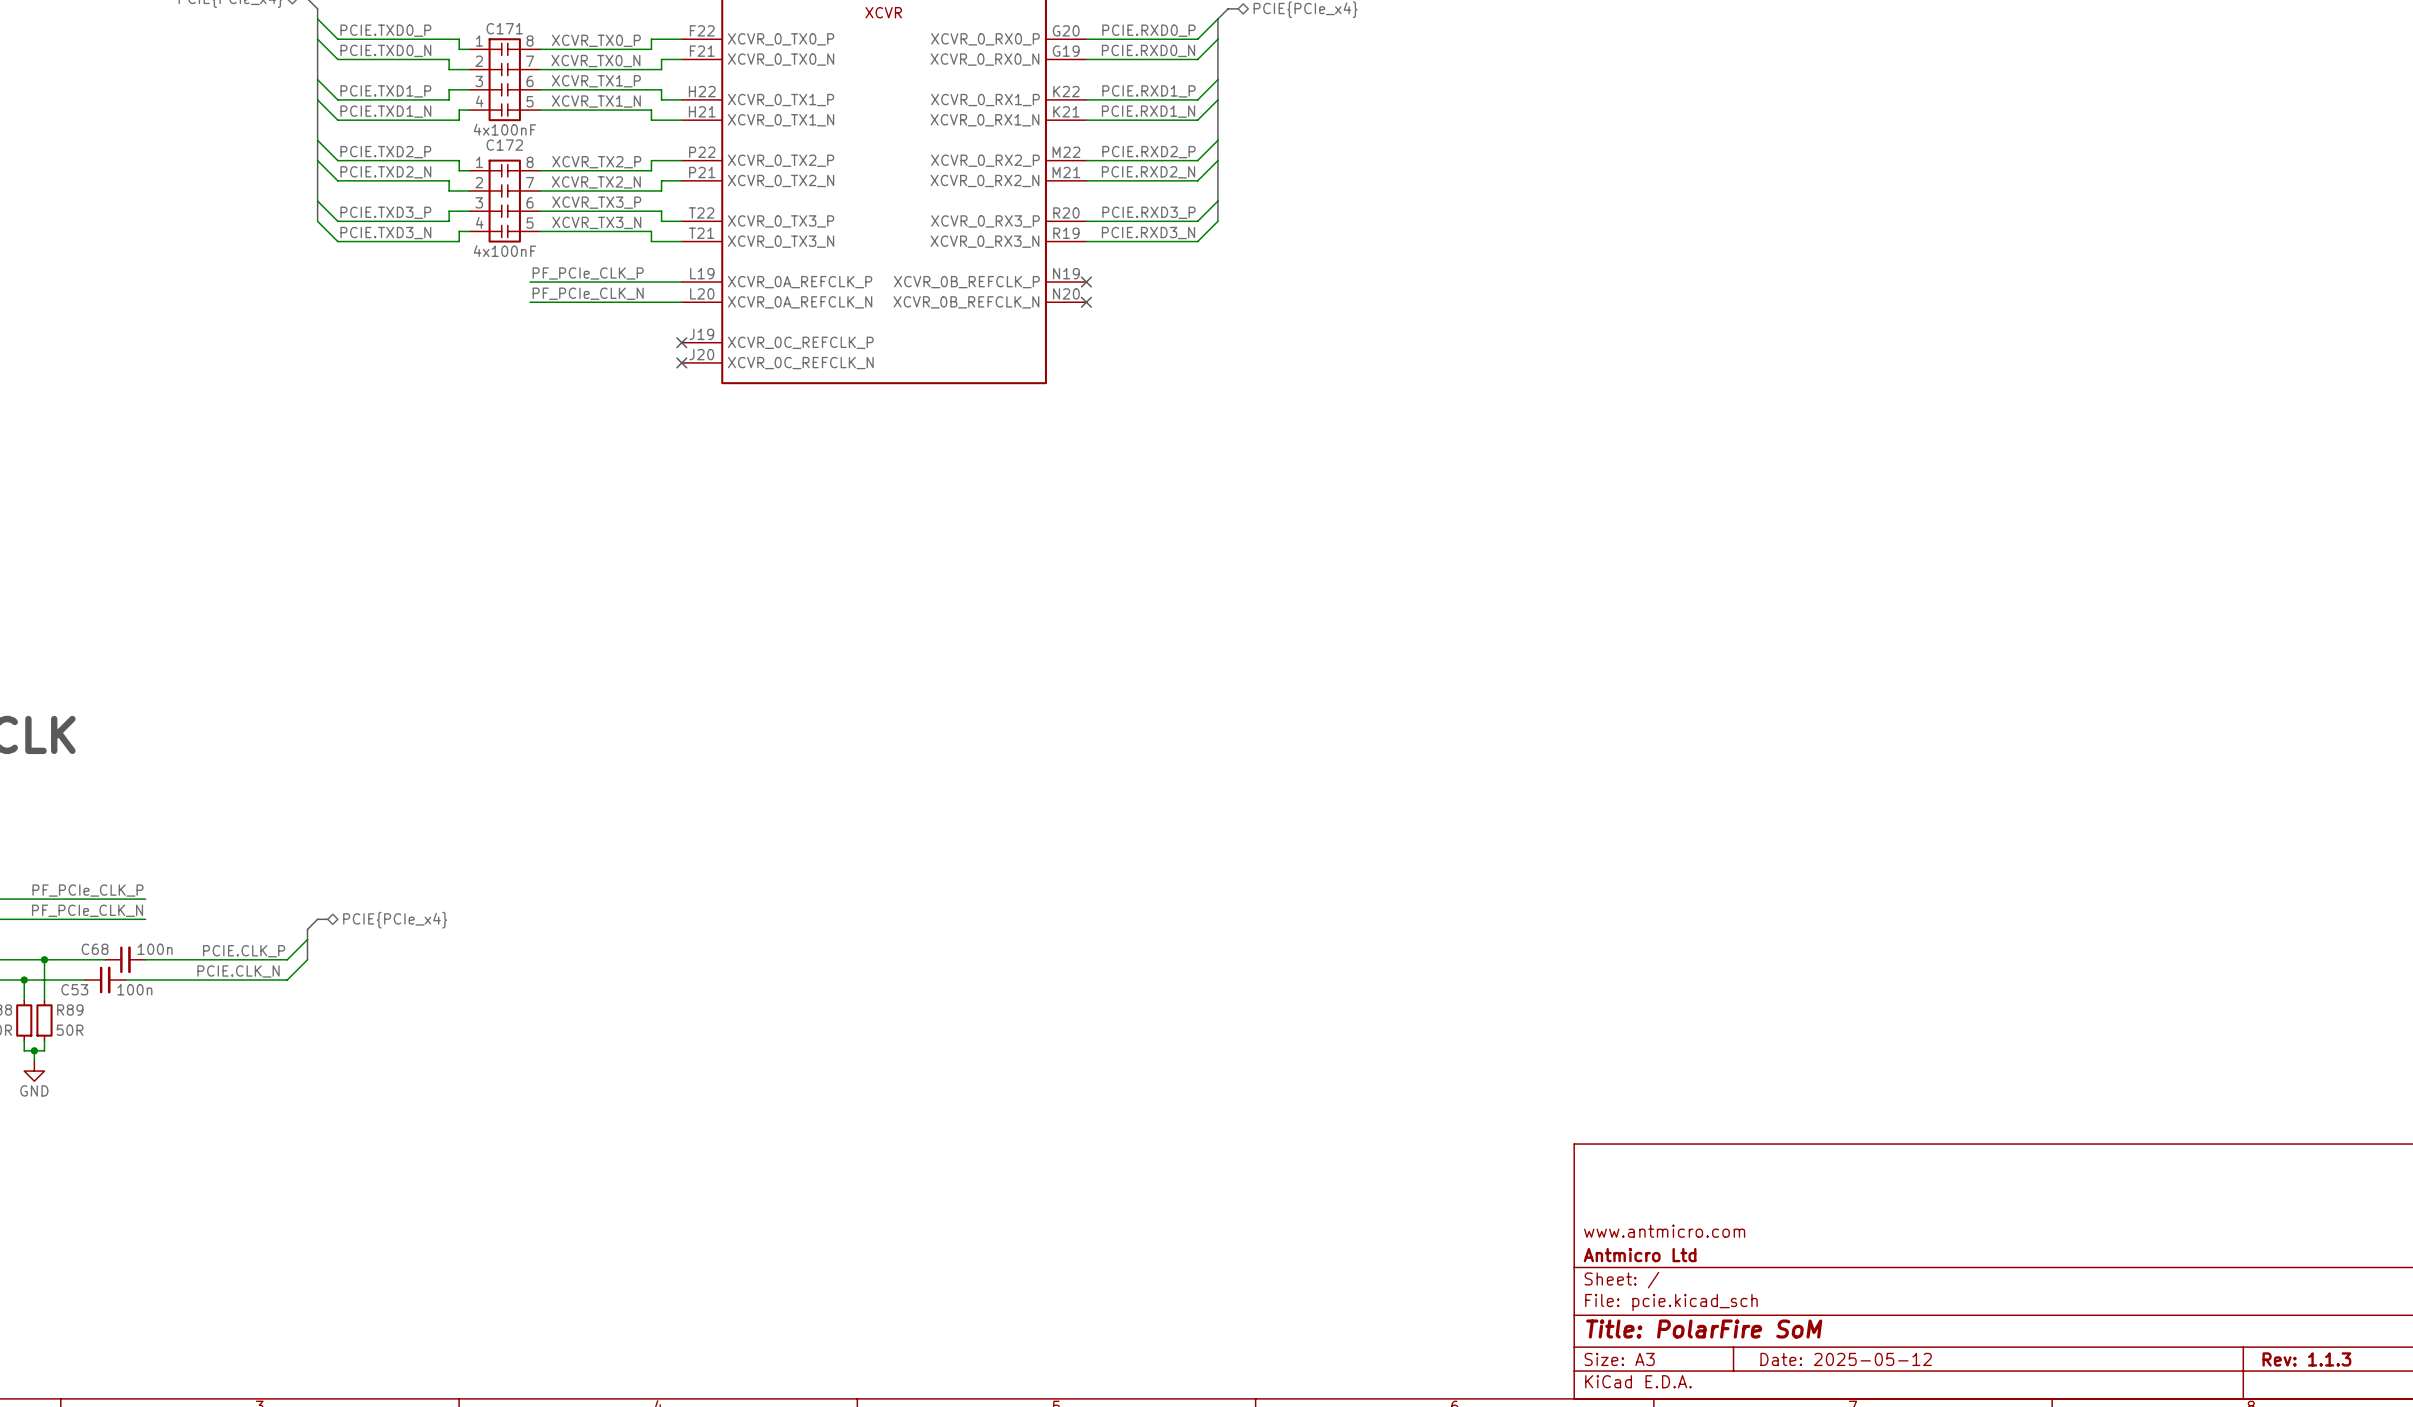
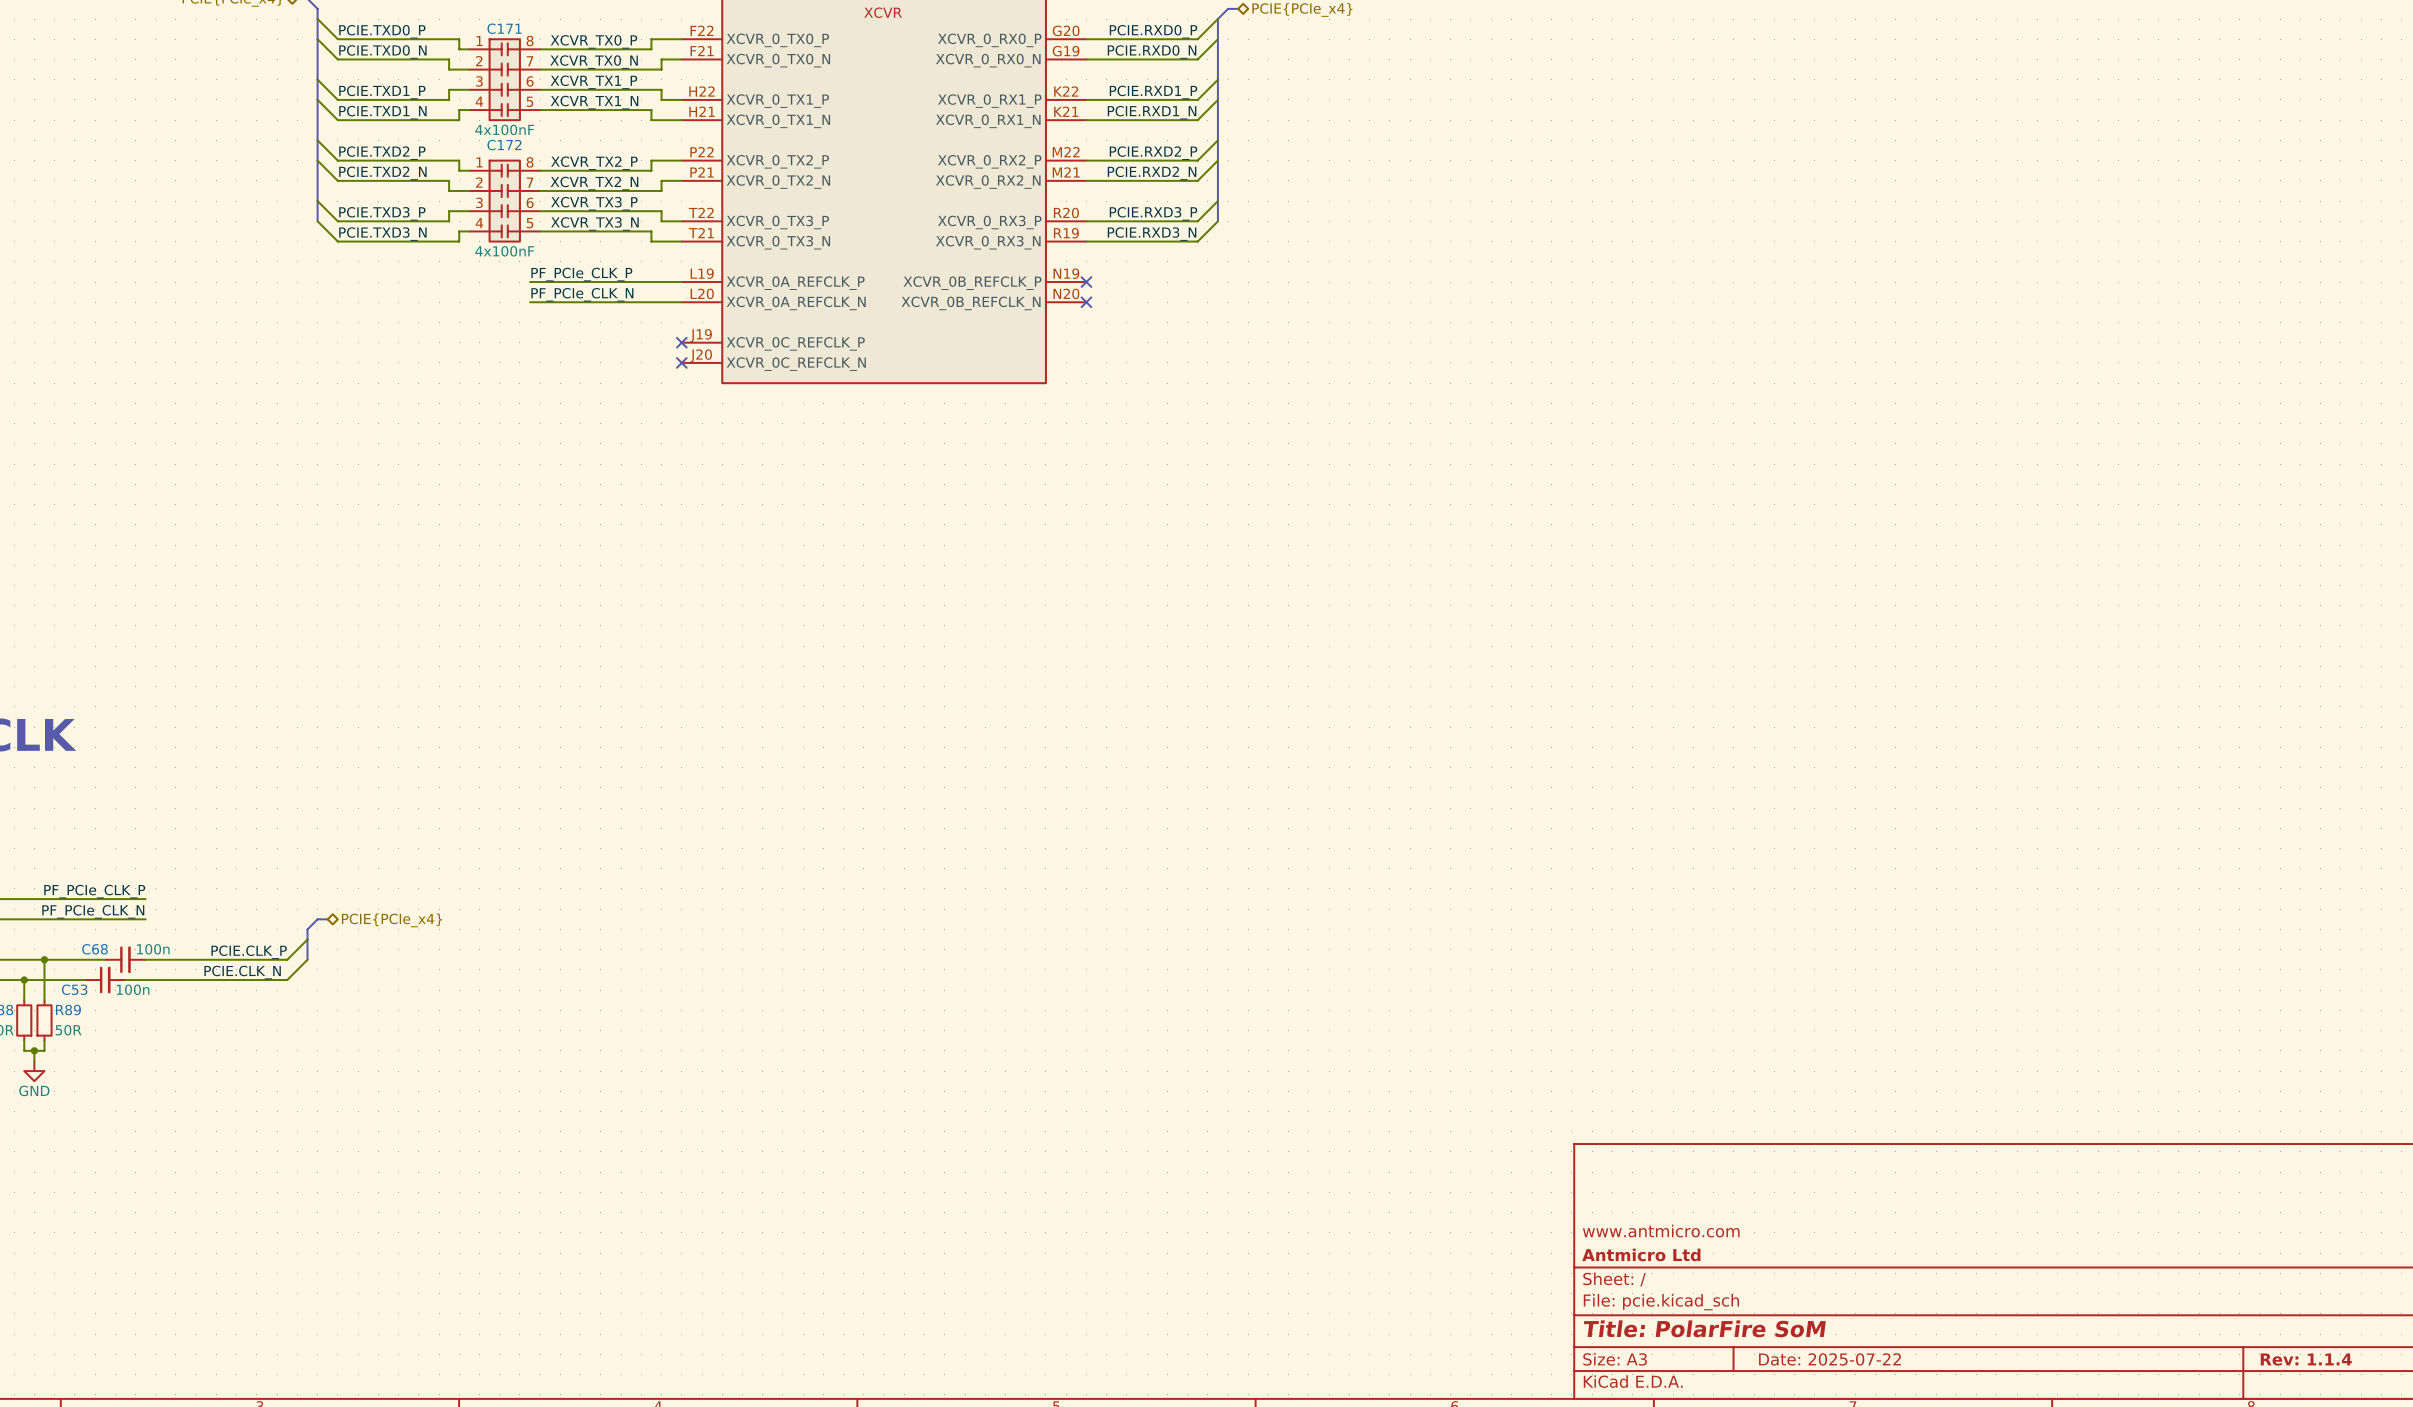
title block: Date: 2025-05-12 (1846, 1359) -> Date: 2025-07-22 (1829, 1359)
title block: Rev: 1.1.3 (2306, 1359) -> Rev: 1.1.4 (2306, 1359)

